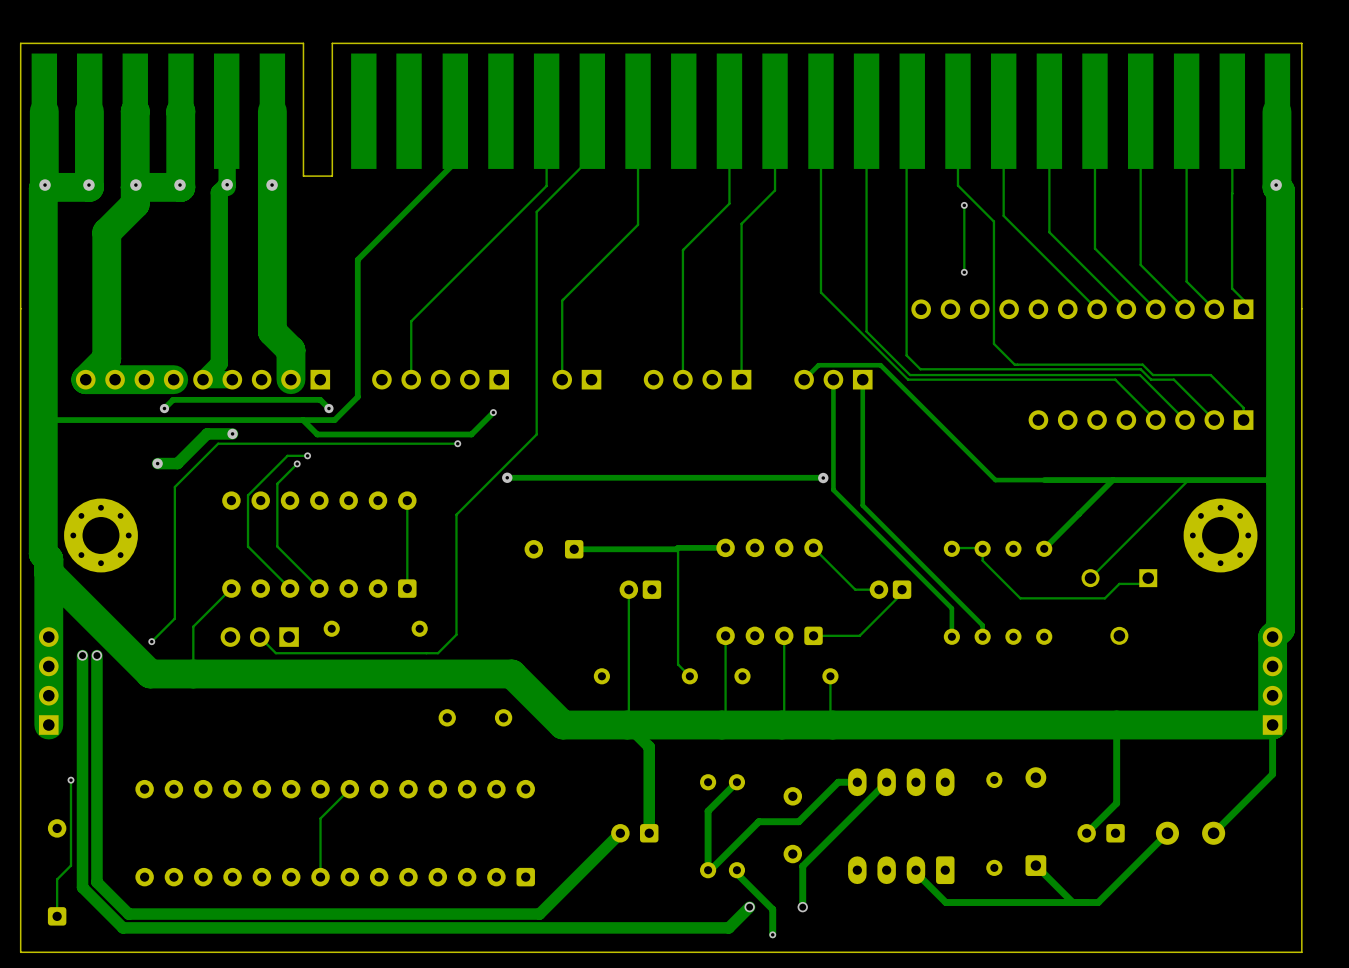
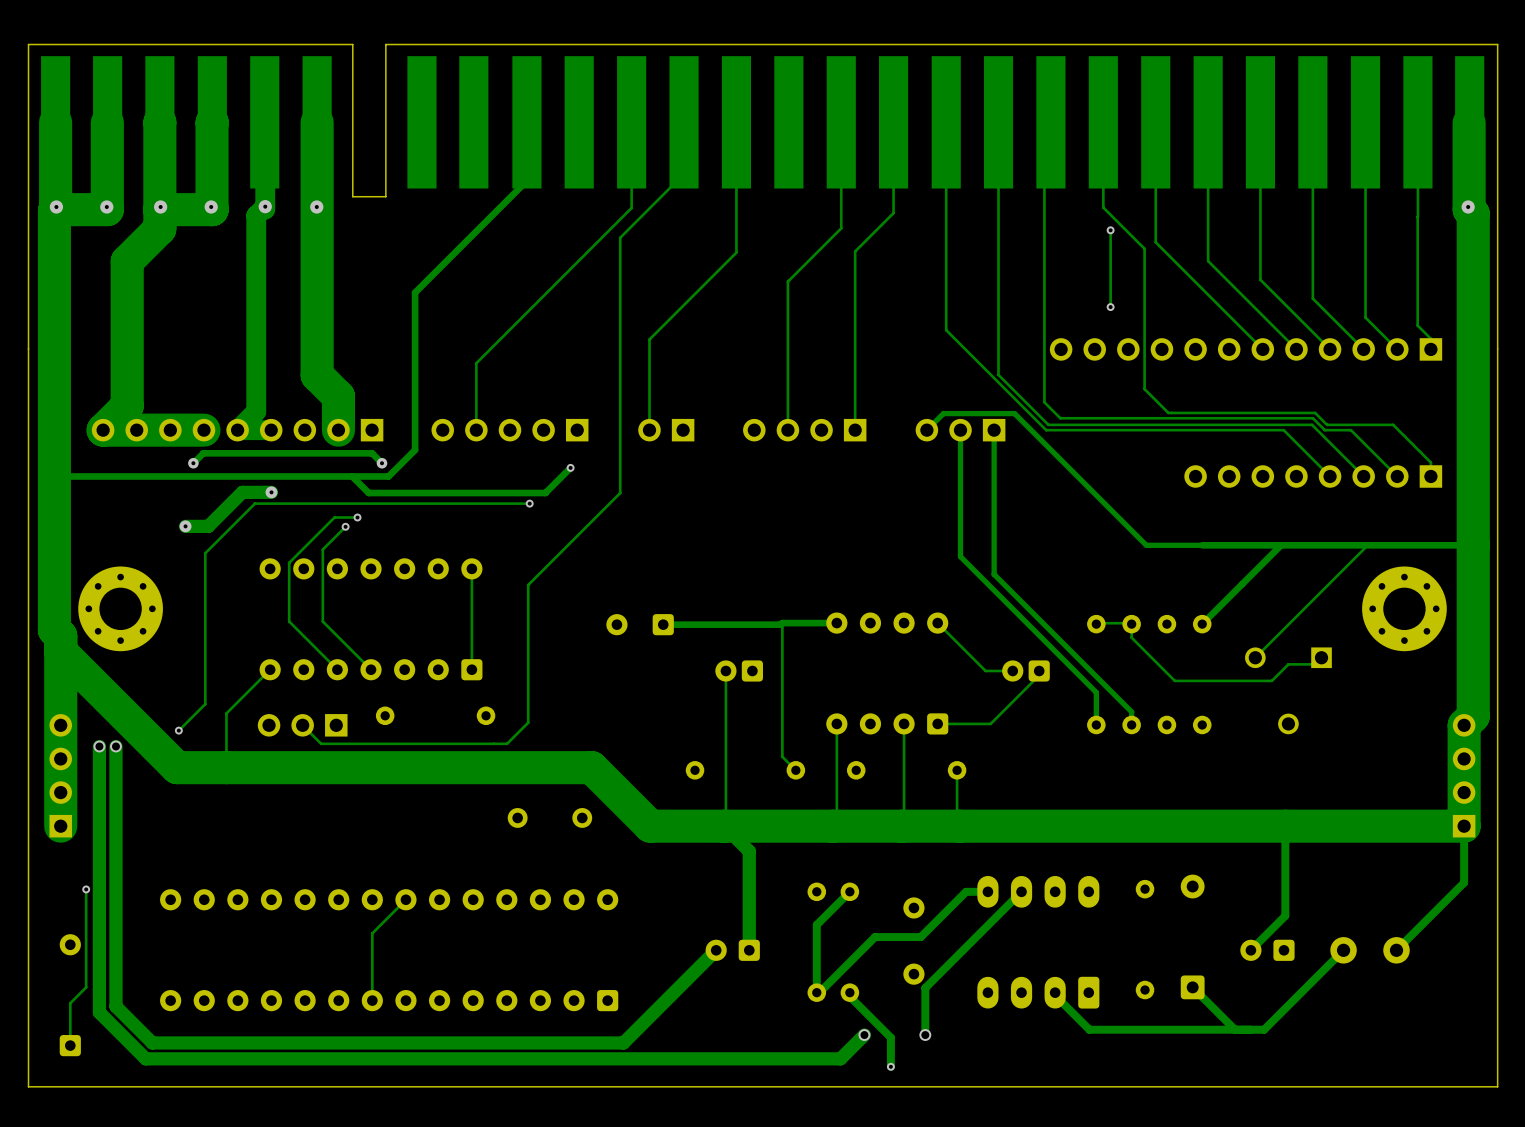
via: (507, 477) -> none
track: (823, 477) (507, 477) -> none
via: (823, 478) -> none

